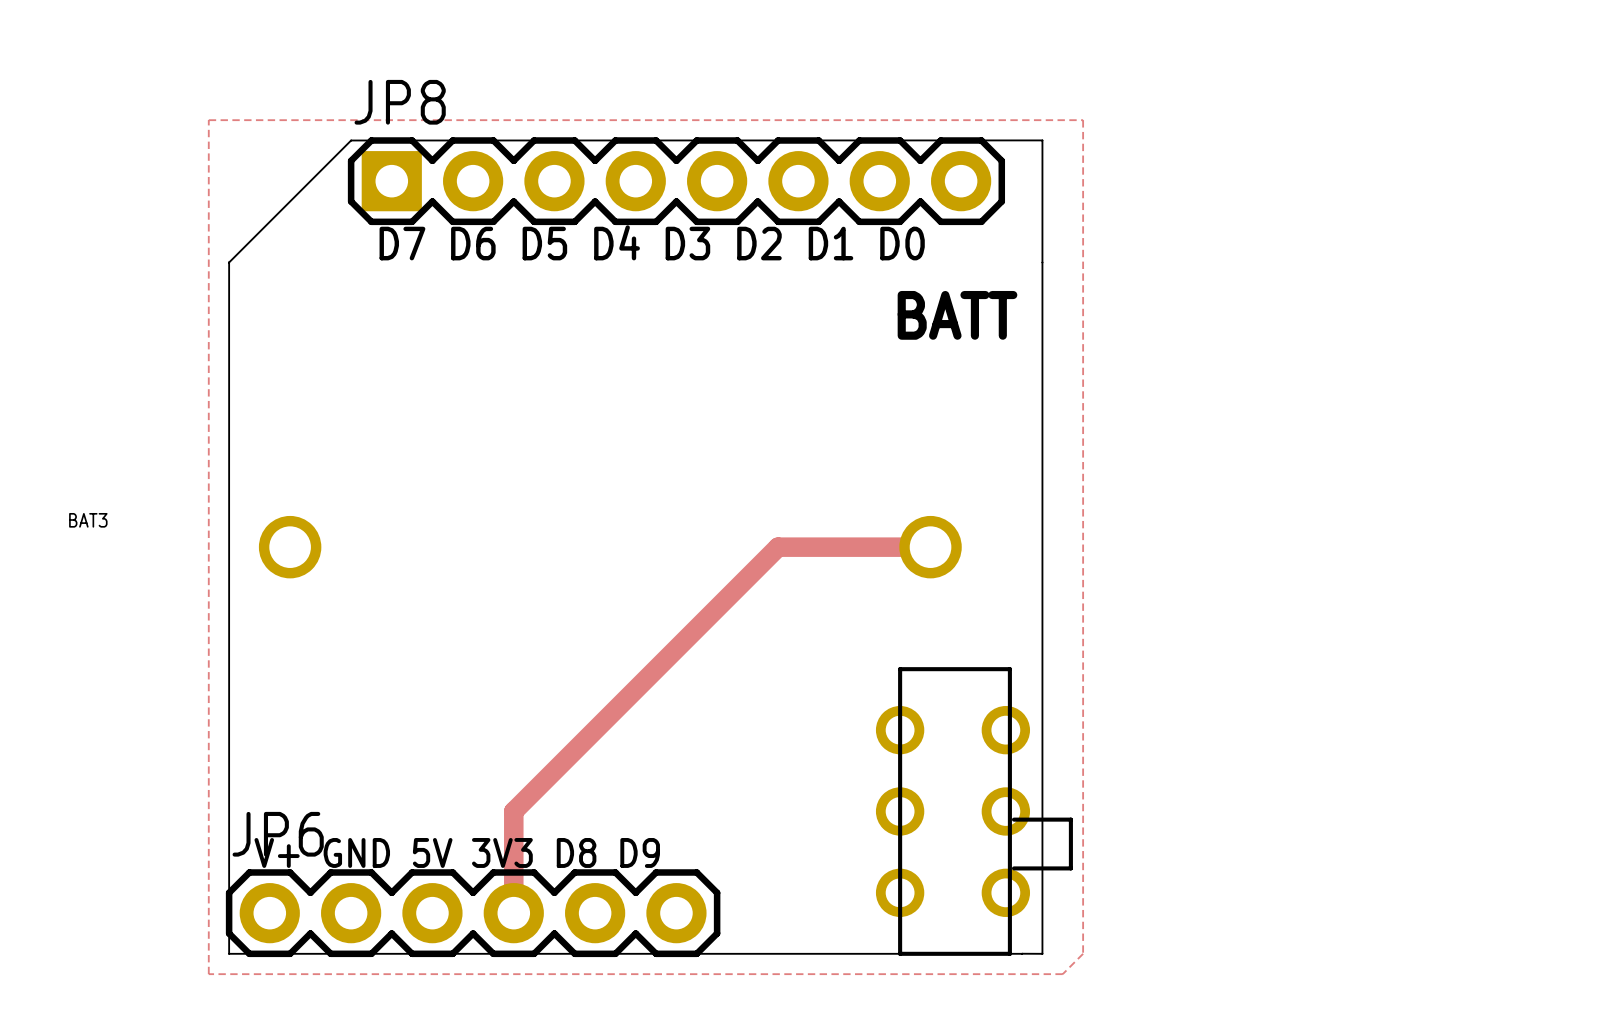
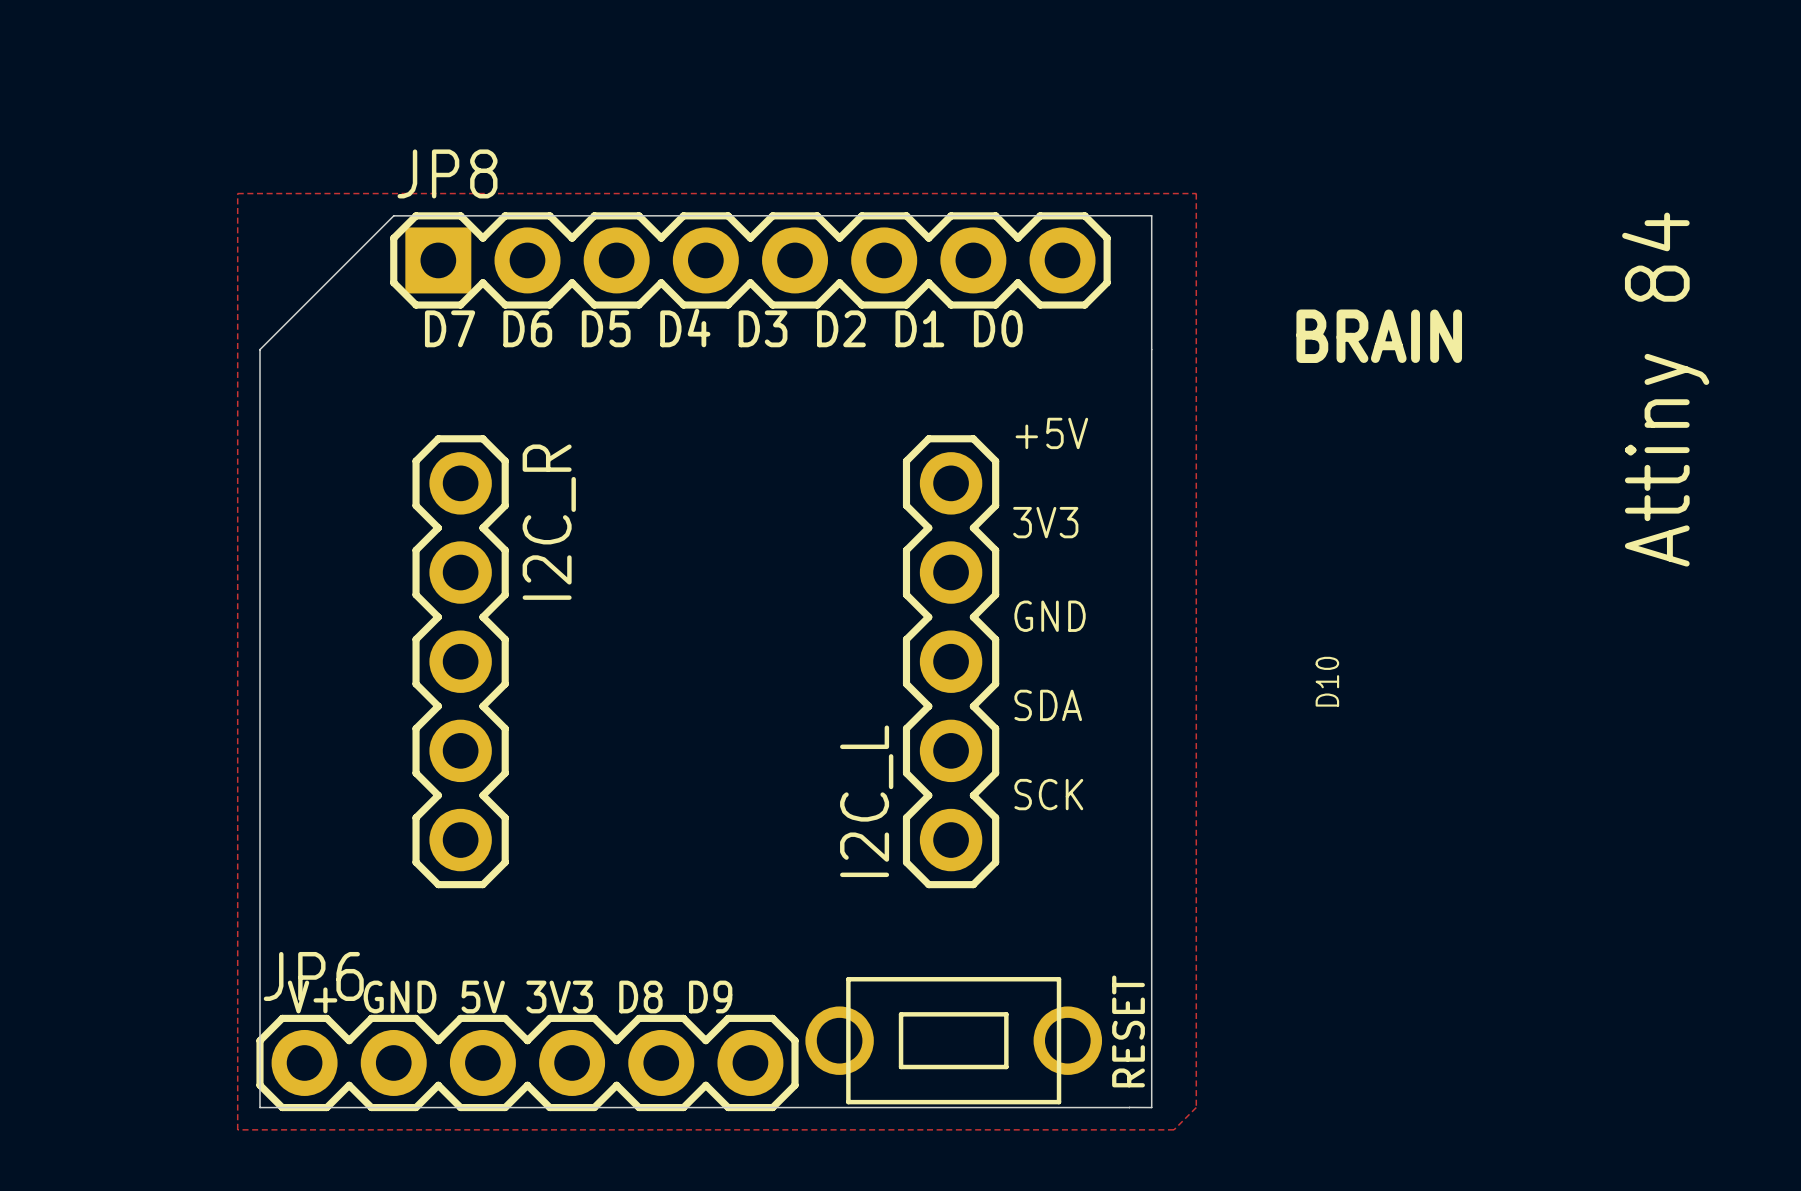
text: none -> BRAIN (1379, 336)
text: none -> Attiny 84 (1665, 389)
text: BATT (957, 315) -> none
text: none -> +5V (1051, 433)
text: none -> 3V3 (1045, 522)
text: none -> GND (1050, 616)
I2C_R: none -> (460, 661)
BAT3: (610, 547) -> none
I2C_L: none -> (951, 661)
track: (930, 547) (778, 547) (513, 811) (513, 913) -> none
text: none -> D10 (1327, 681)
text: none -> SDA (1048, 705)
text: none -> SCK (1048, 794)
part: (974, 811) -> none
text: none -> RESET (1128, 1031)
part: none -> (953, 1040)

